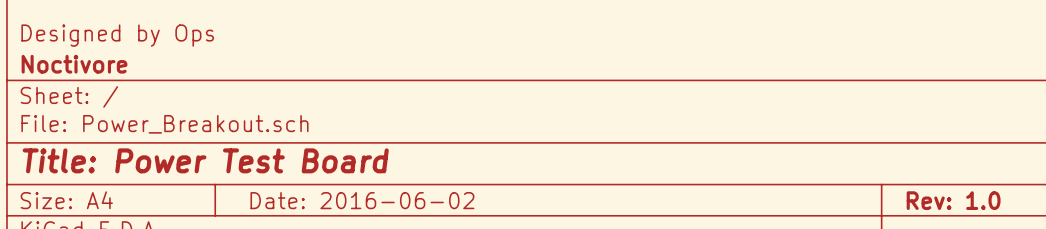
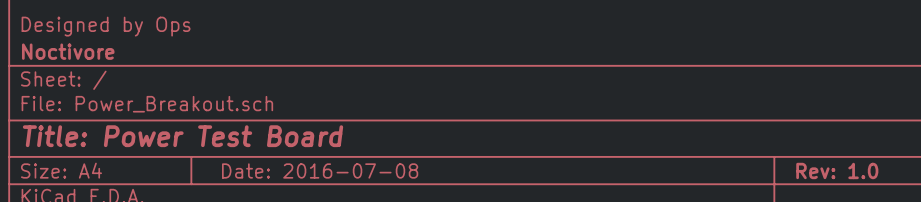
title block: Date: 2016-06-02 (362, 200) -> Date: 2016-07-08 (320, 170)

